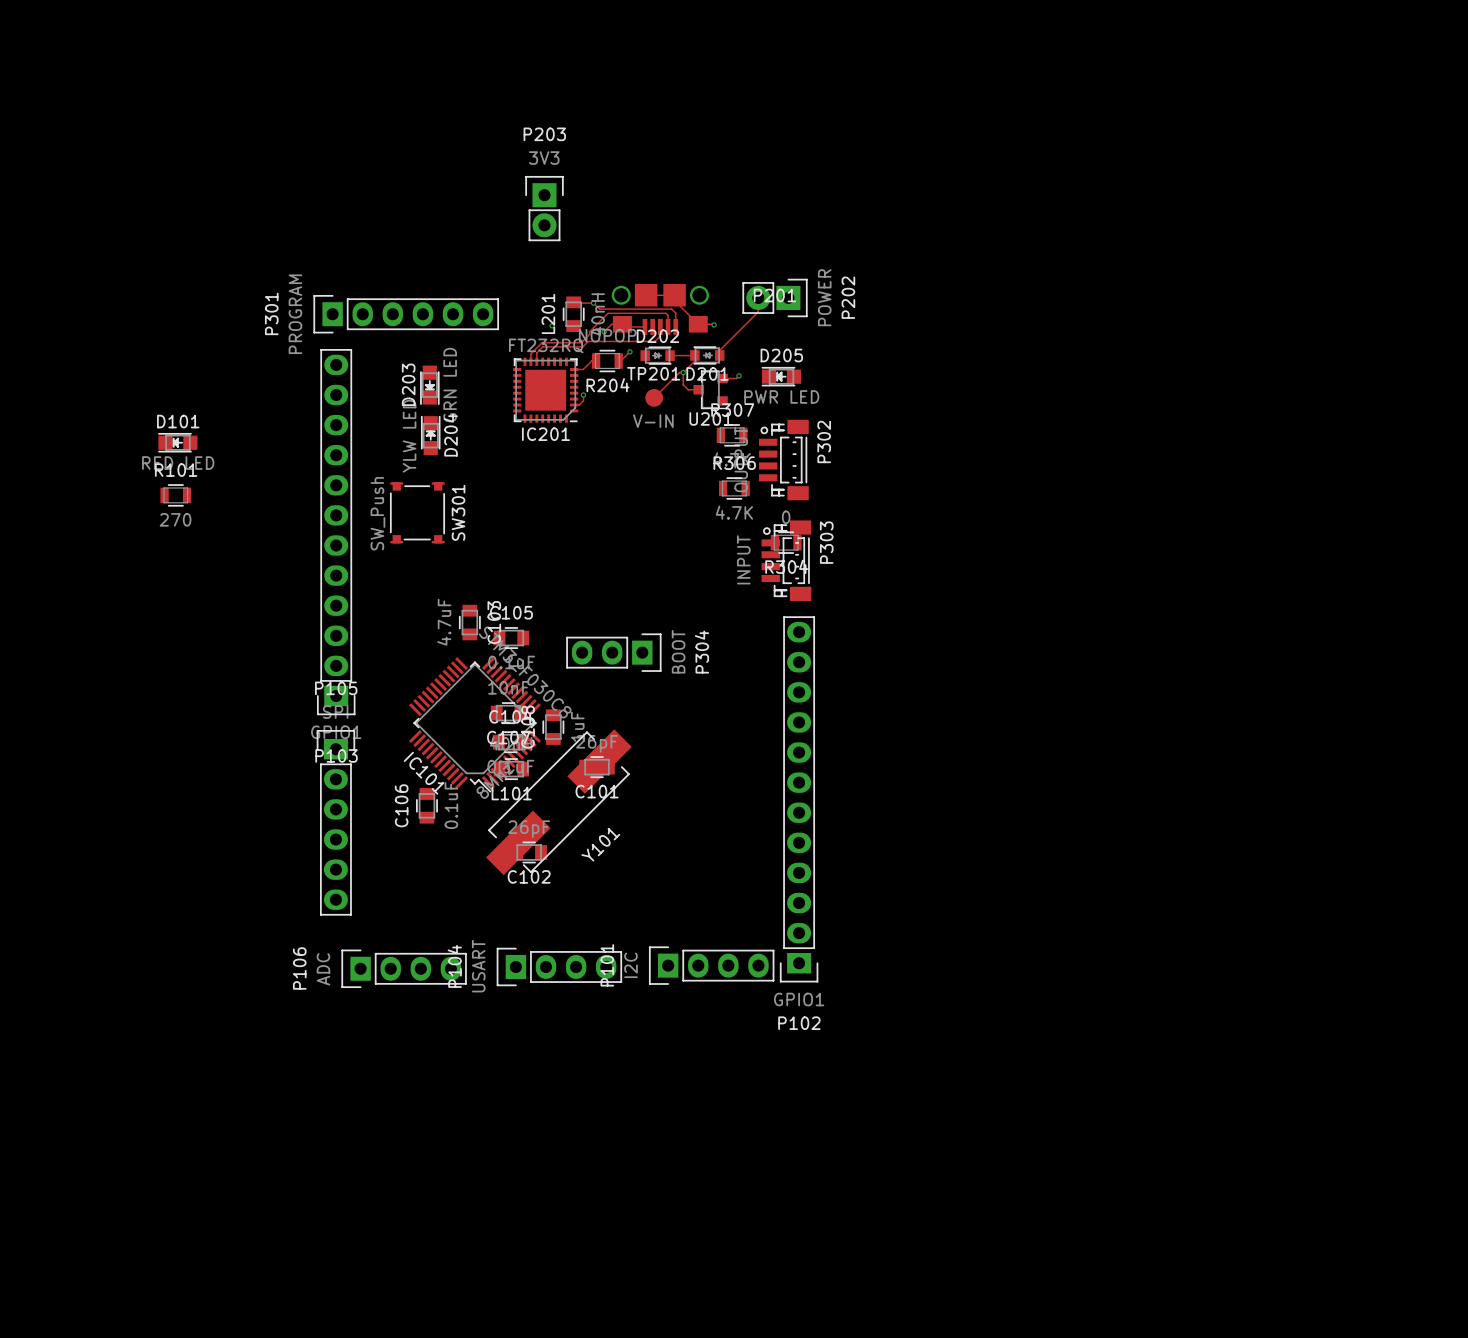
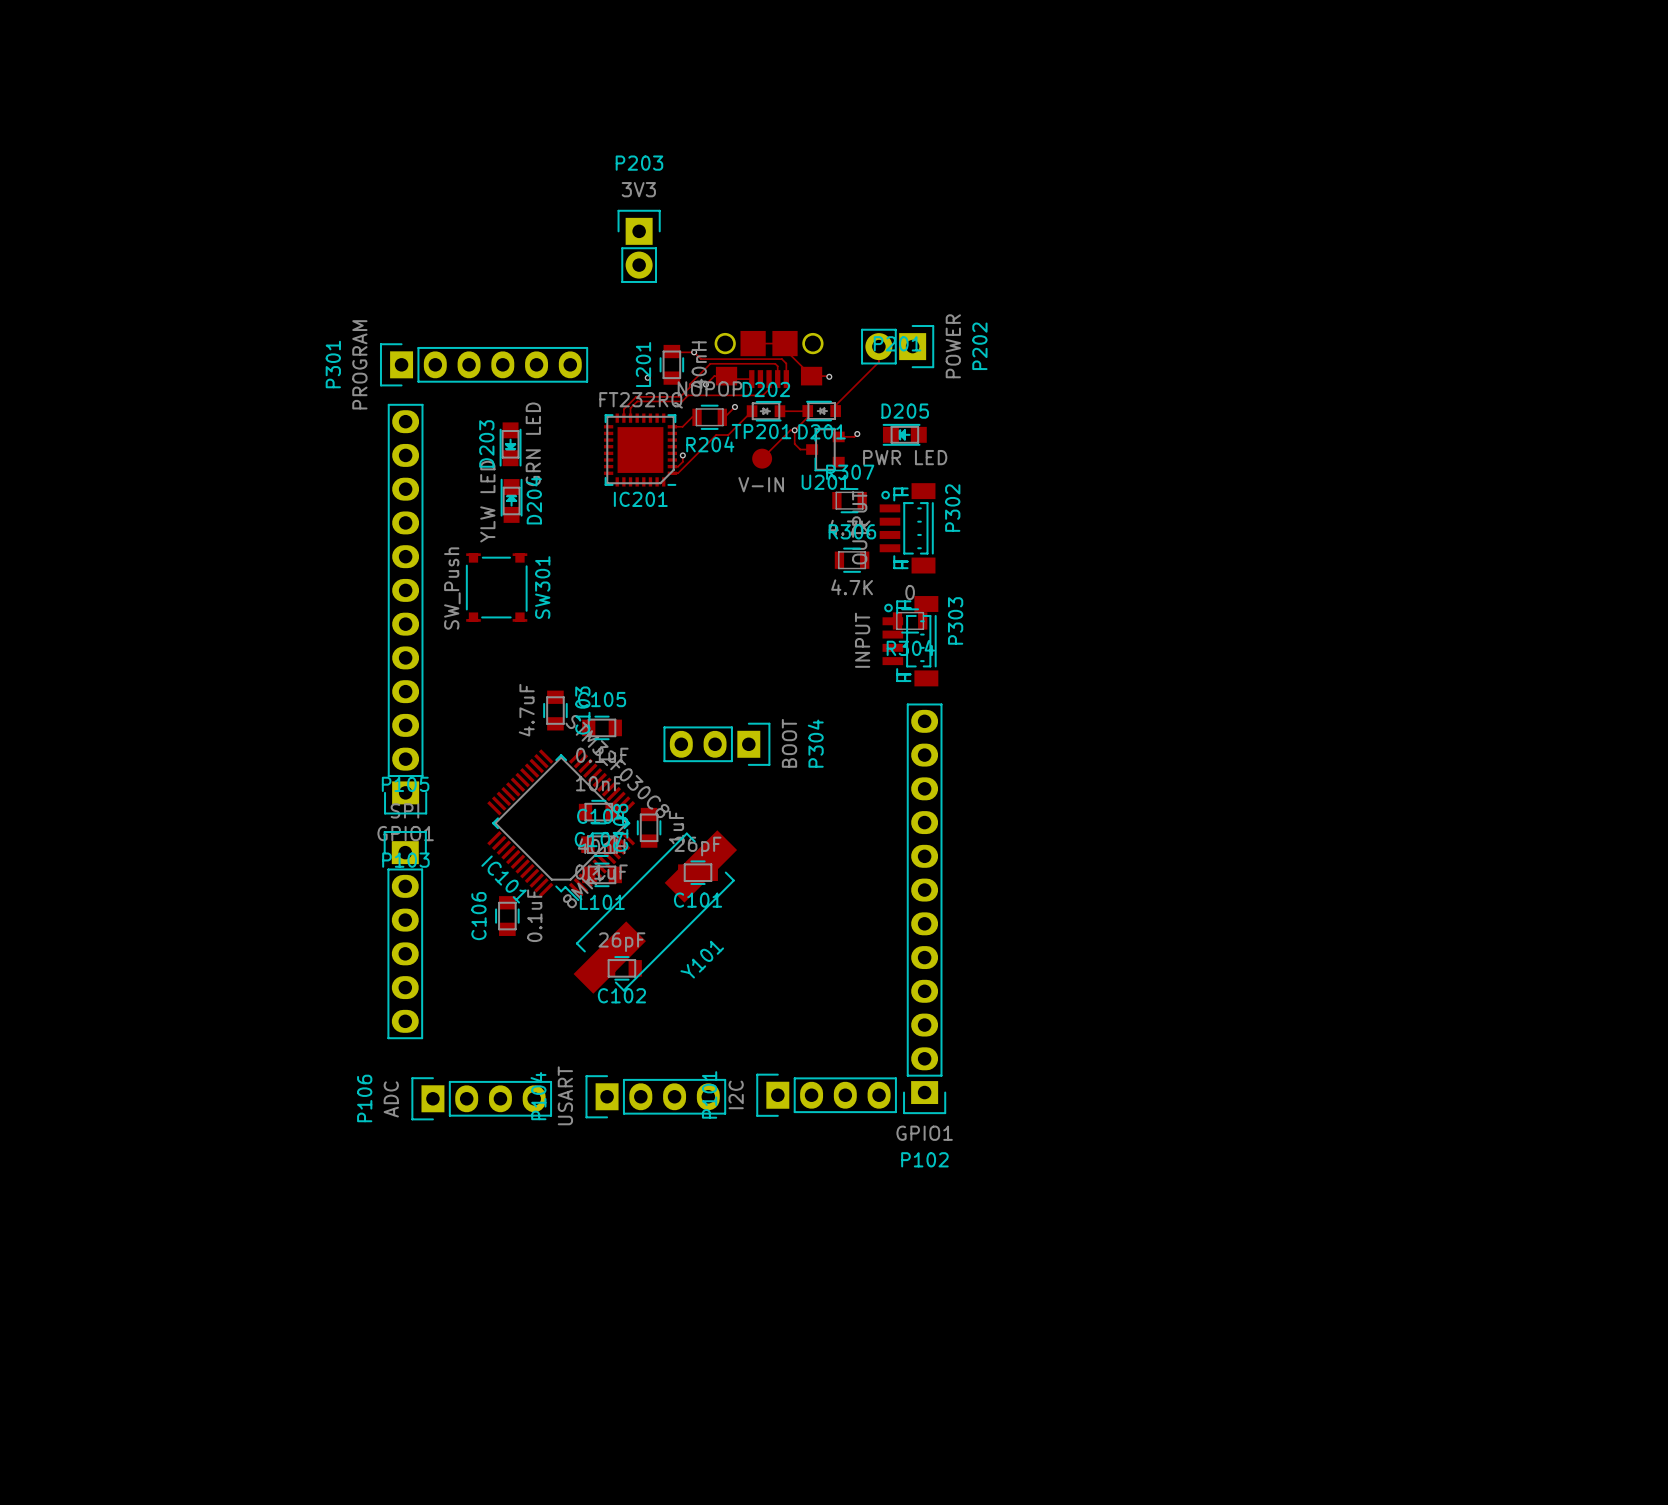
track: none -> (752, 411) (728, 435) (716, 435) (677, 473) (672, 473)
D101: RED LED (177, 442) -> none
R101: 270 (175, 495) -> none

